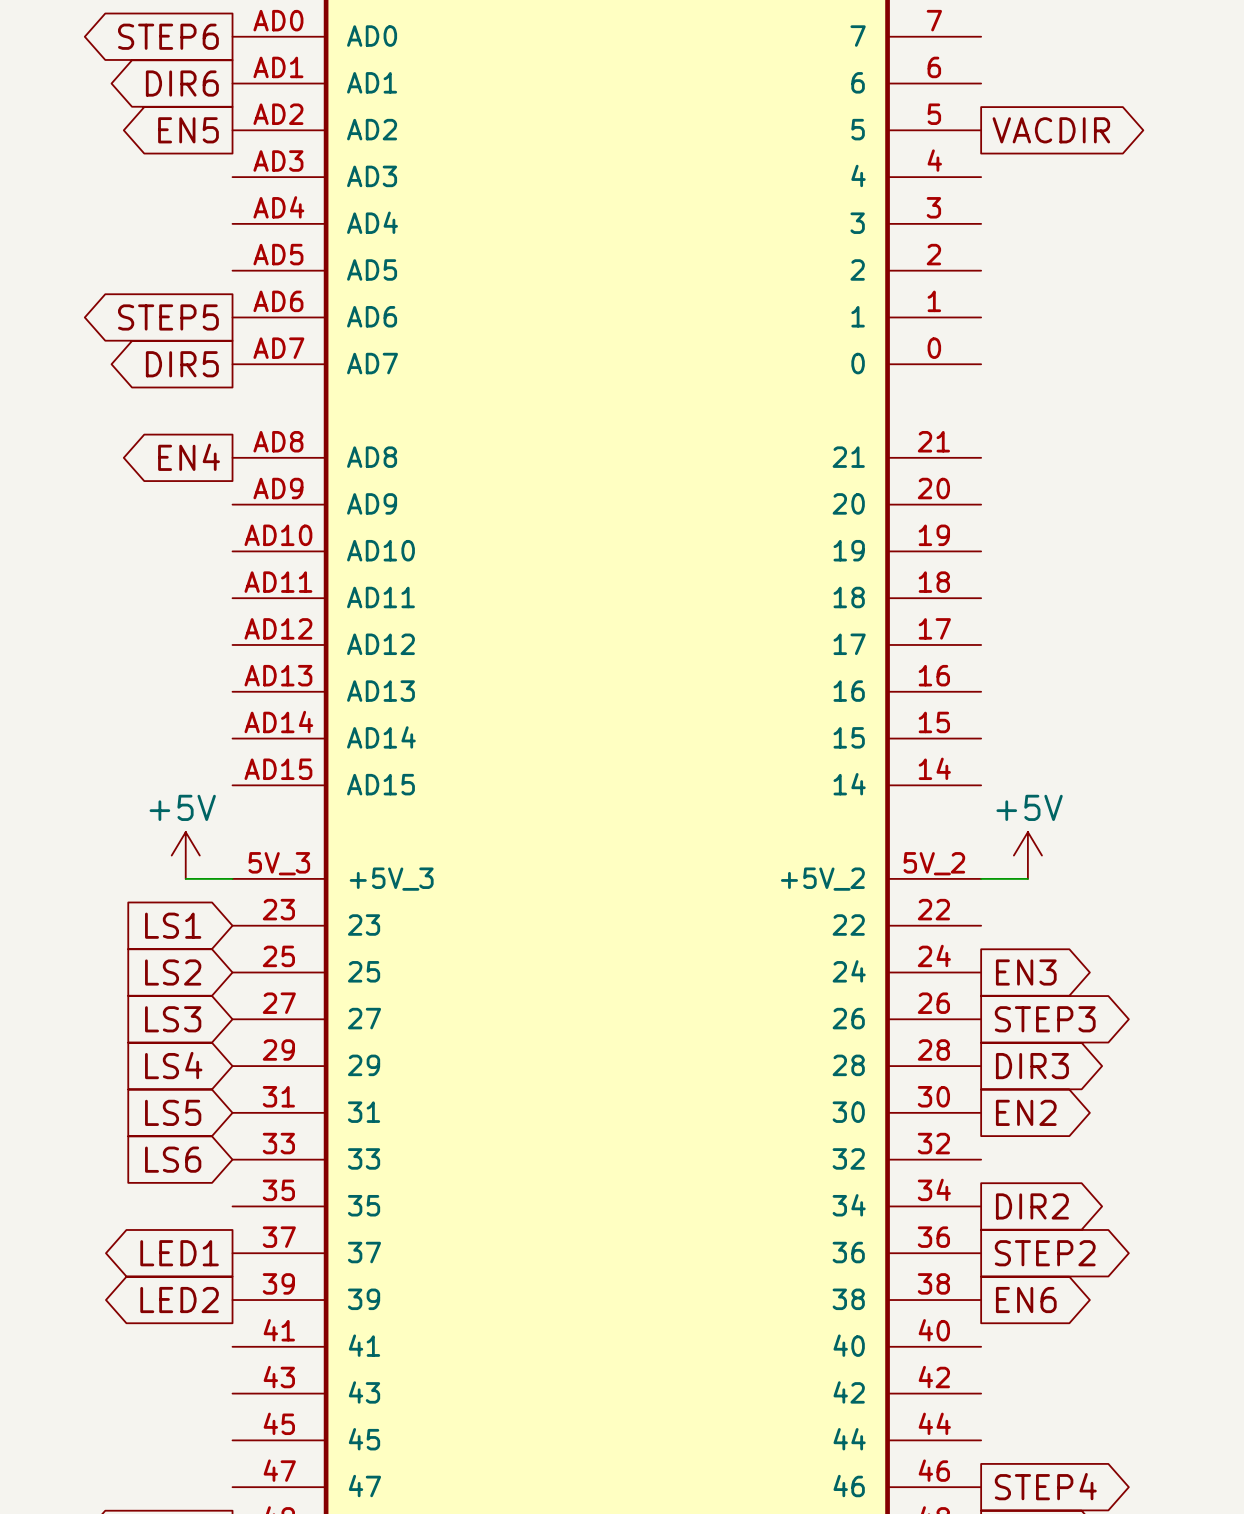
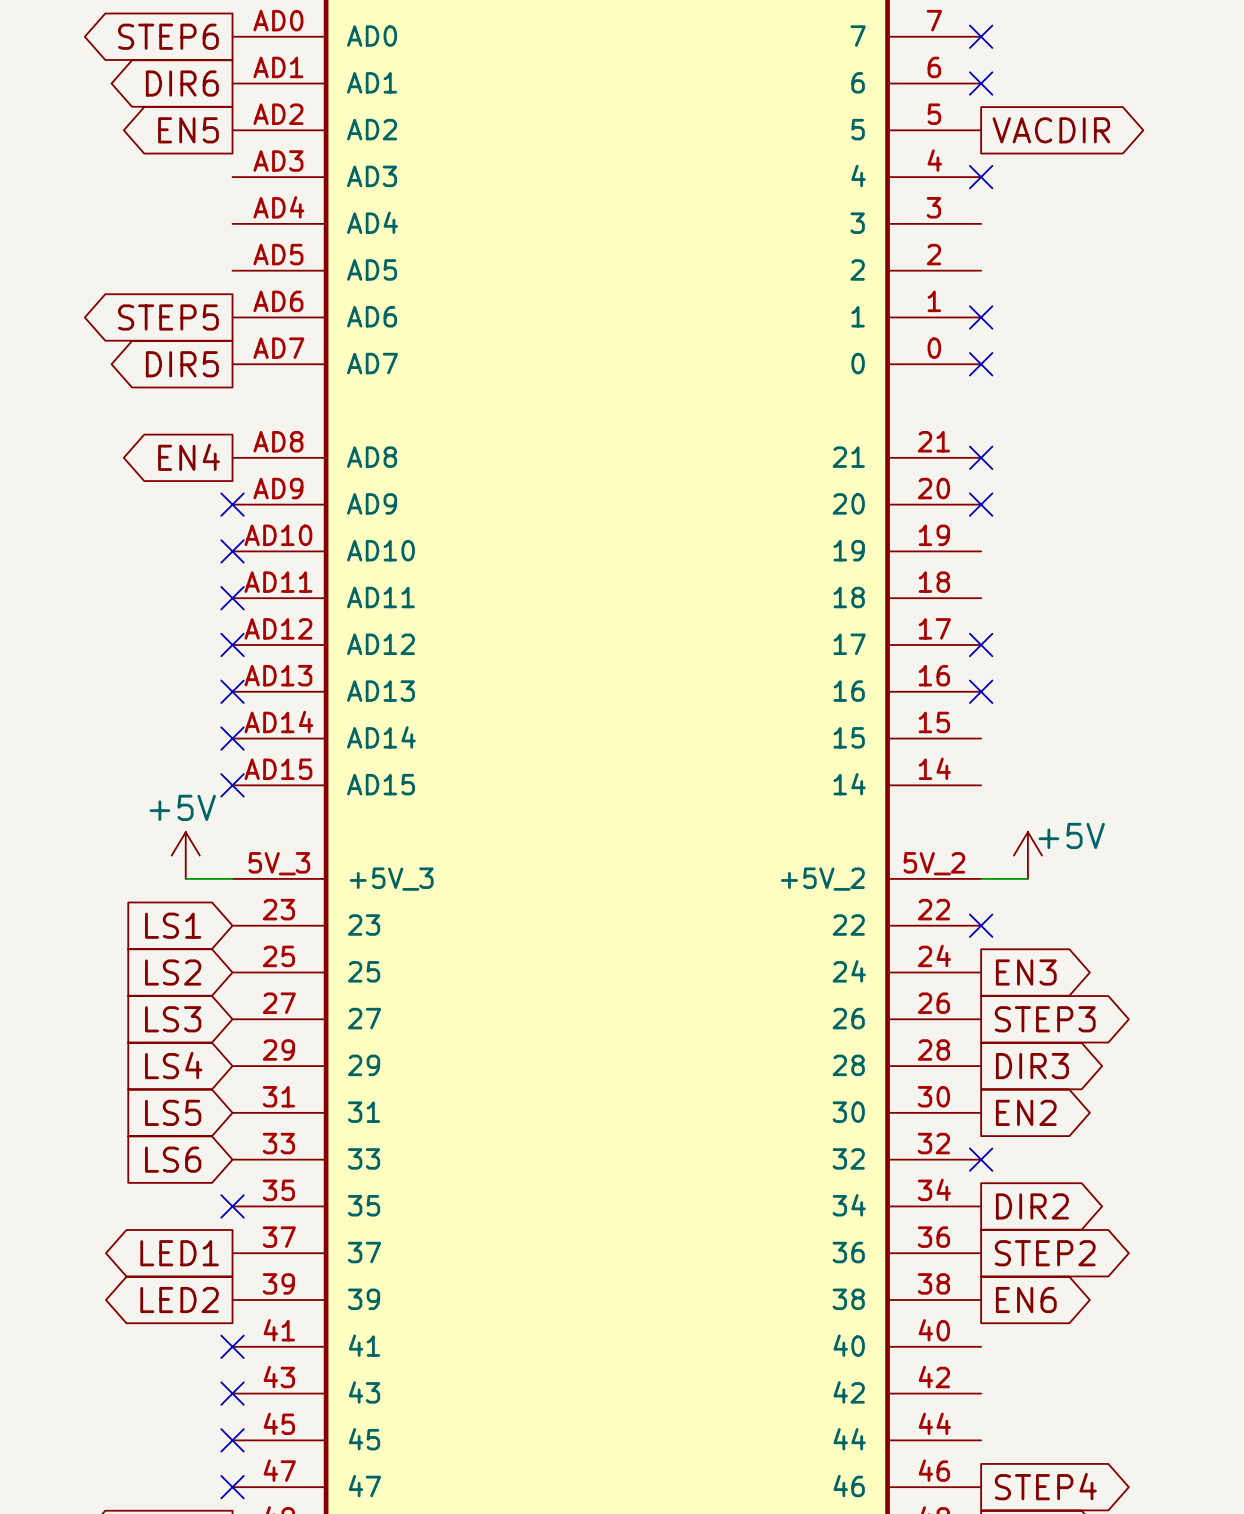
no-connect mark: none -> (981, 36)
no-connect mark: none -> (981, 83)
no-connect mark: none -> (981, 177)
no-connect mark: none -> (981, 317)
no-connect mark: none -> (981, 364)
no-connect mark: none -> (981, 457)
no-connect mark: none -> (232, 504)
no-connect mark: none -> (981, 504)
no-connect mark: none -> (232, 551)
no-connect mark: none -> (232, 598)
no-connect mark: none -> (232, 644)
no-connect mark: none -> (981, 644)
no-connect mark: none -> (232, 691)
no-connect mark: none -> (981, 691)
no-connect mark: none -> (232, 738)
no-connect mark: none -> (232, 785)
power symbol text position: +5V (1029, 807) -> +5V (1071, 835)
no-connect mark: none -> (981, 925)
no-connect mark: none -> (981, 1159)
no-connect mark: none -> (232, 1206)
no-connect mark: none -> (232, 1346)
no-connect mark: none -> (232, 1393)
no-connect mark: none -> (232, 1440)
no-connect mark: none -> (232, 1487)

